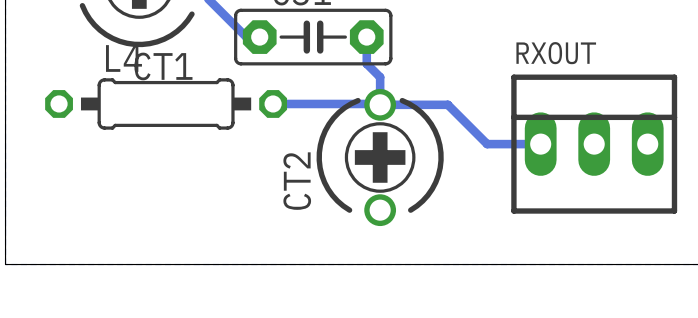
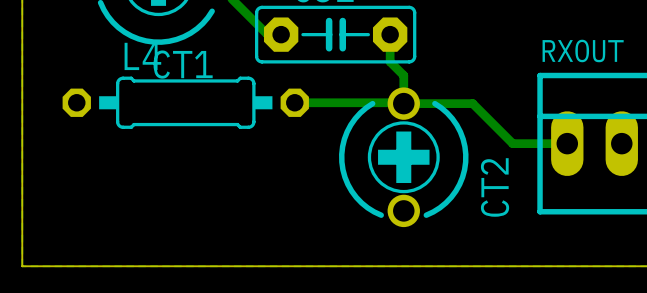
CT2 rotation: 0° (380, 157) -> 180° (403, 157)
CT2 name position: CT2 (297, 181) -> CT2 (495, 187)

